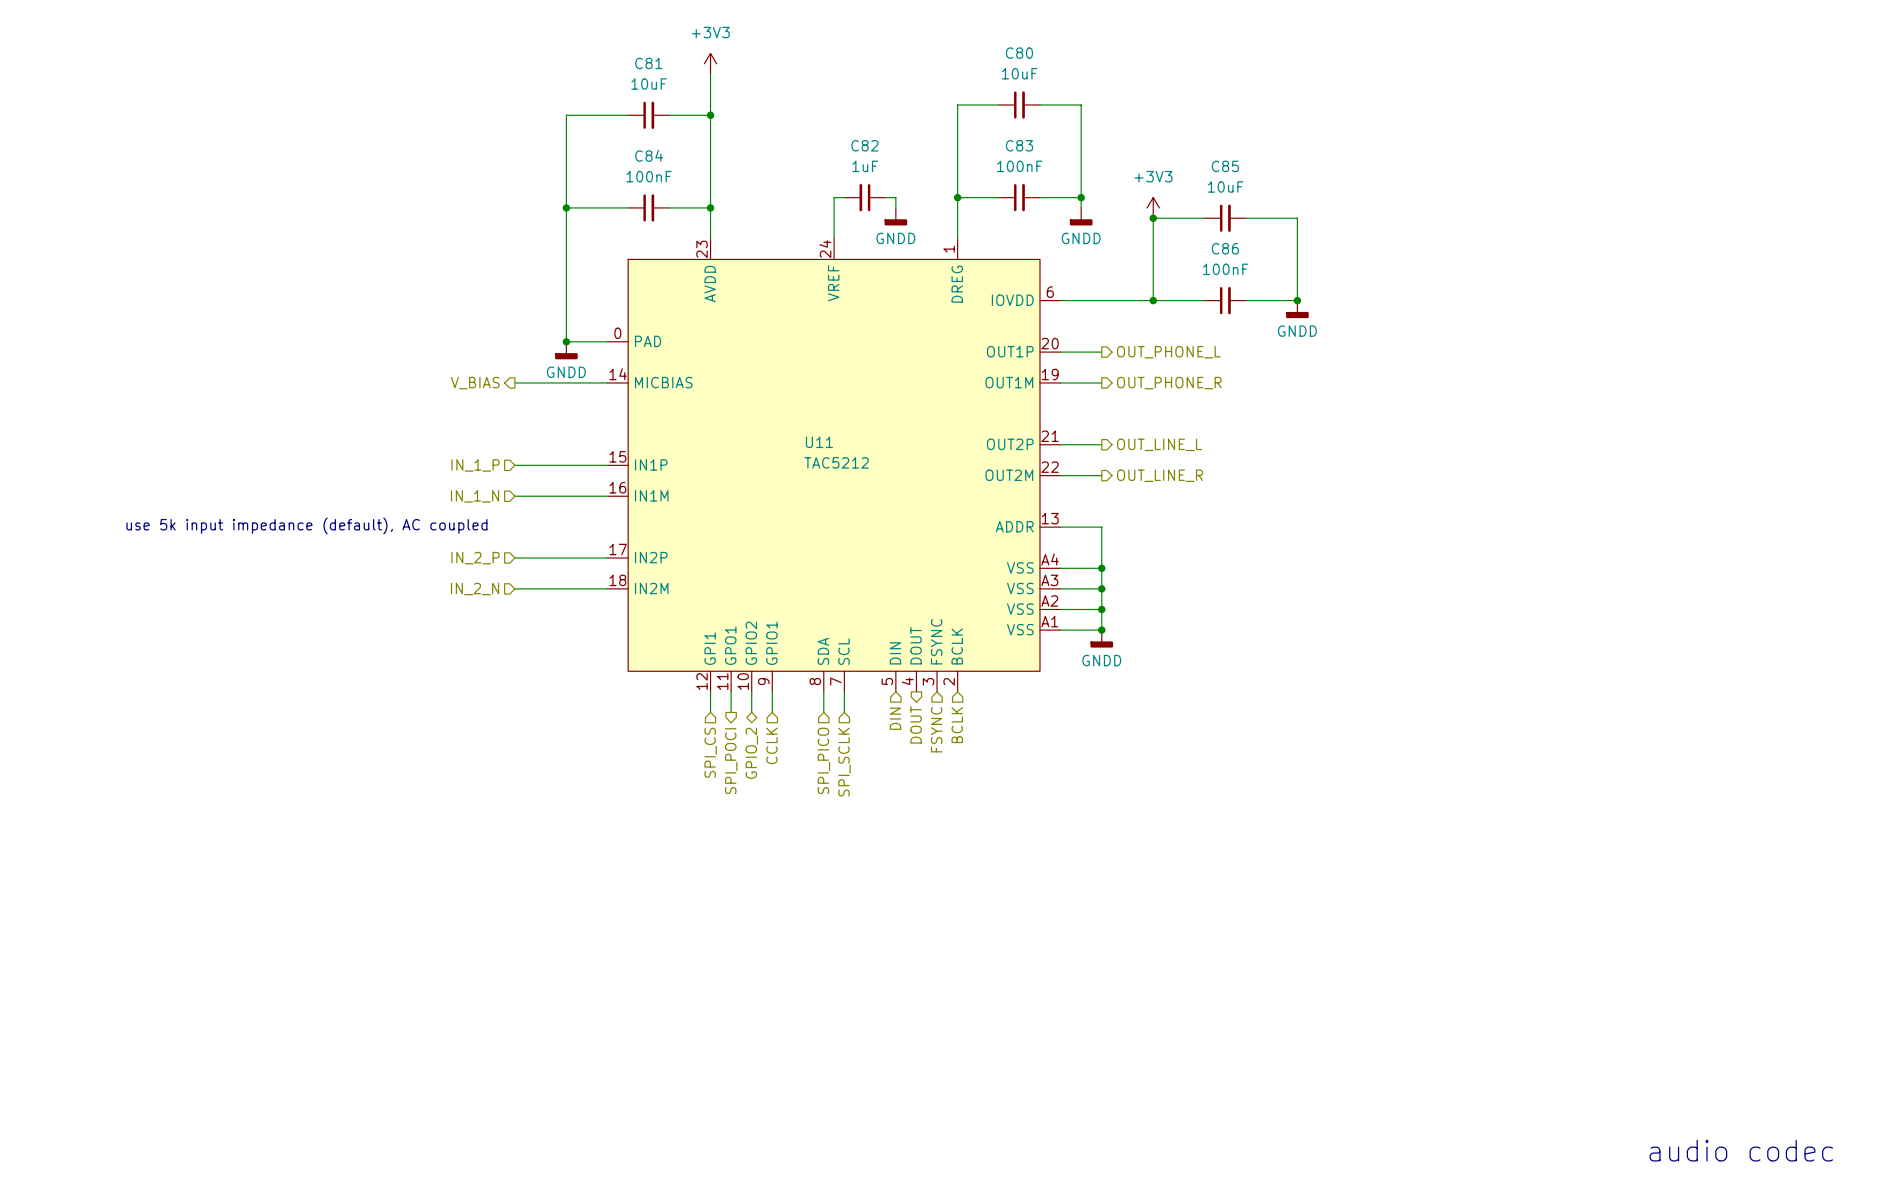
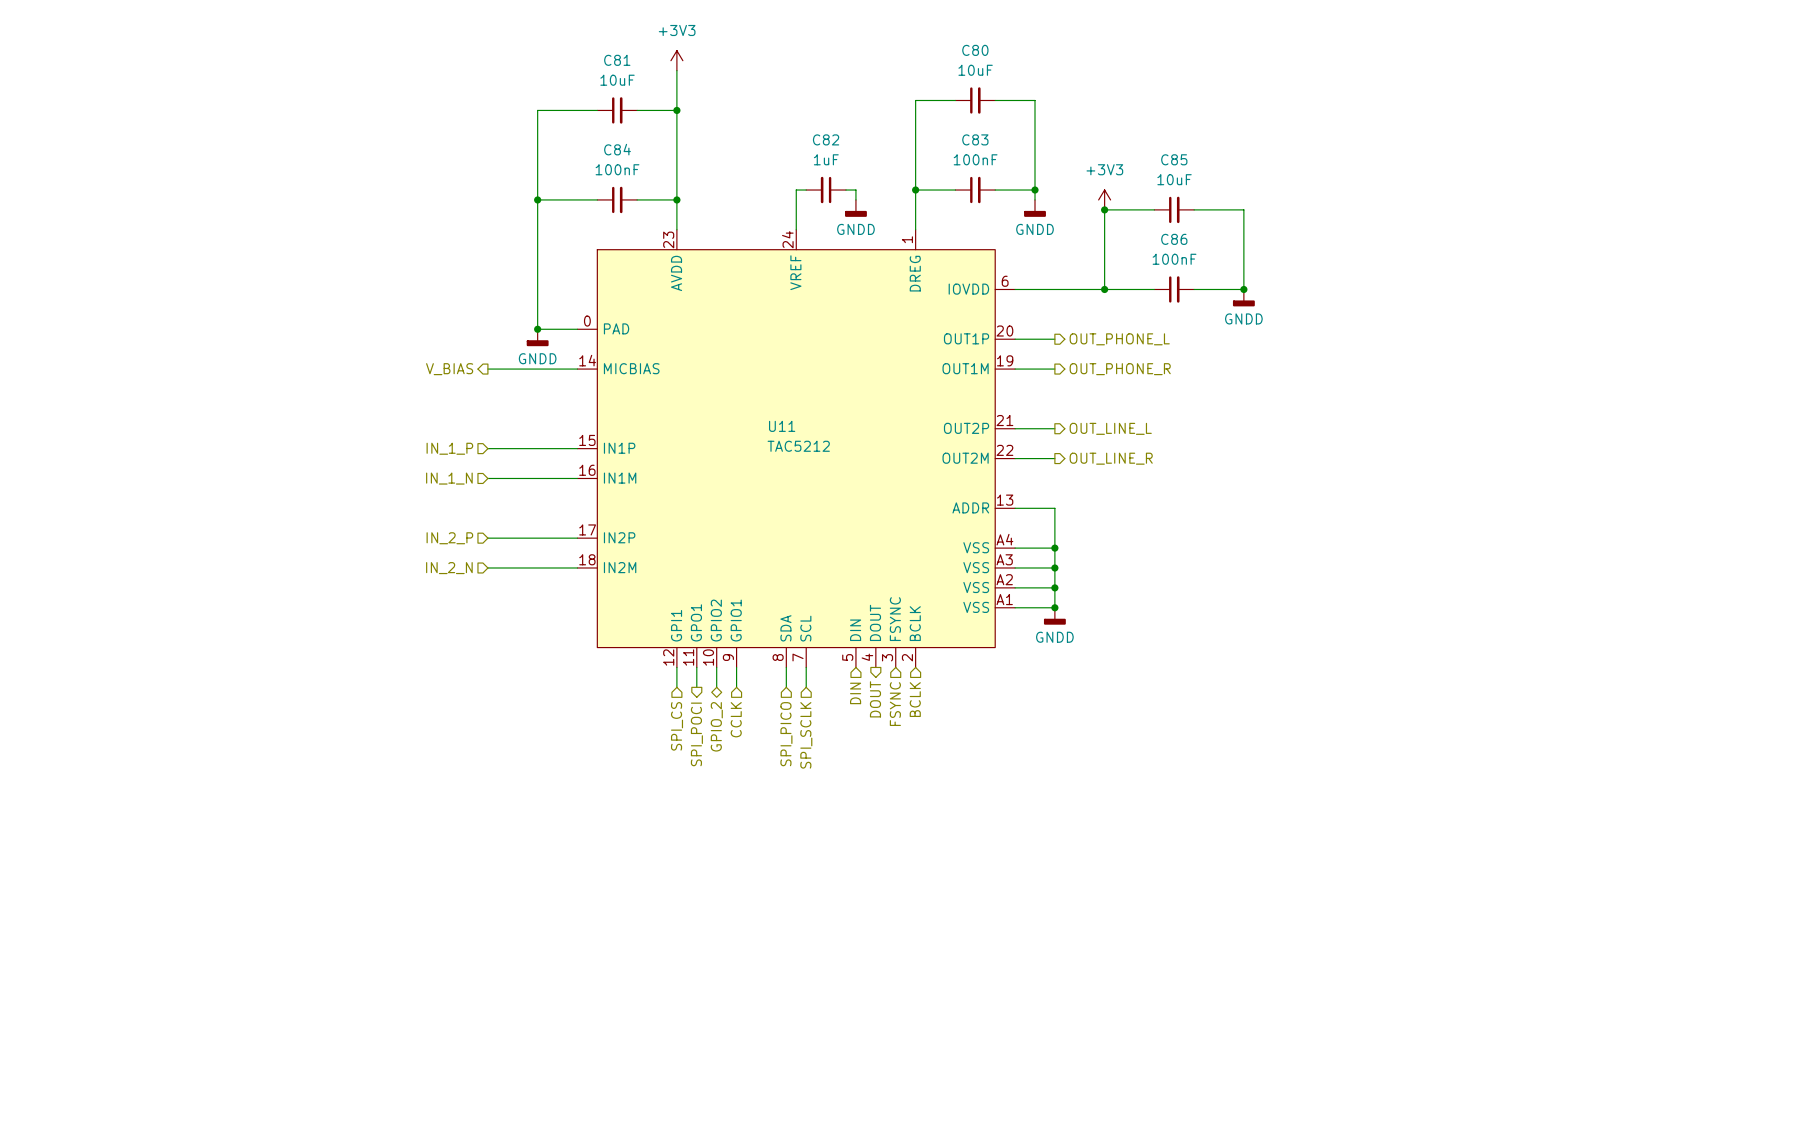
text: use 5k input impedance (default), AC coupled (306, 525) -> none
text: audio codec (1741, 1150) -> none

